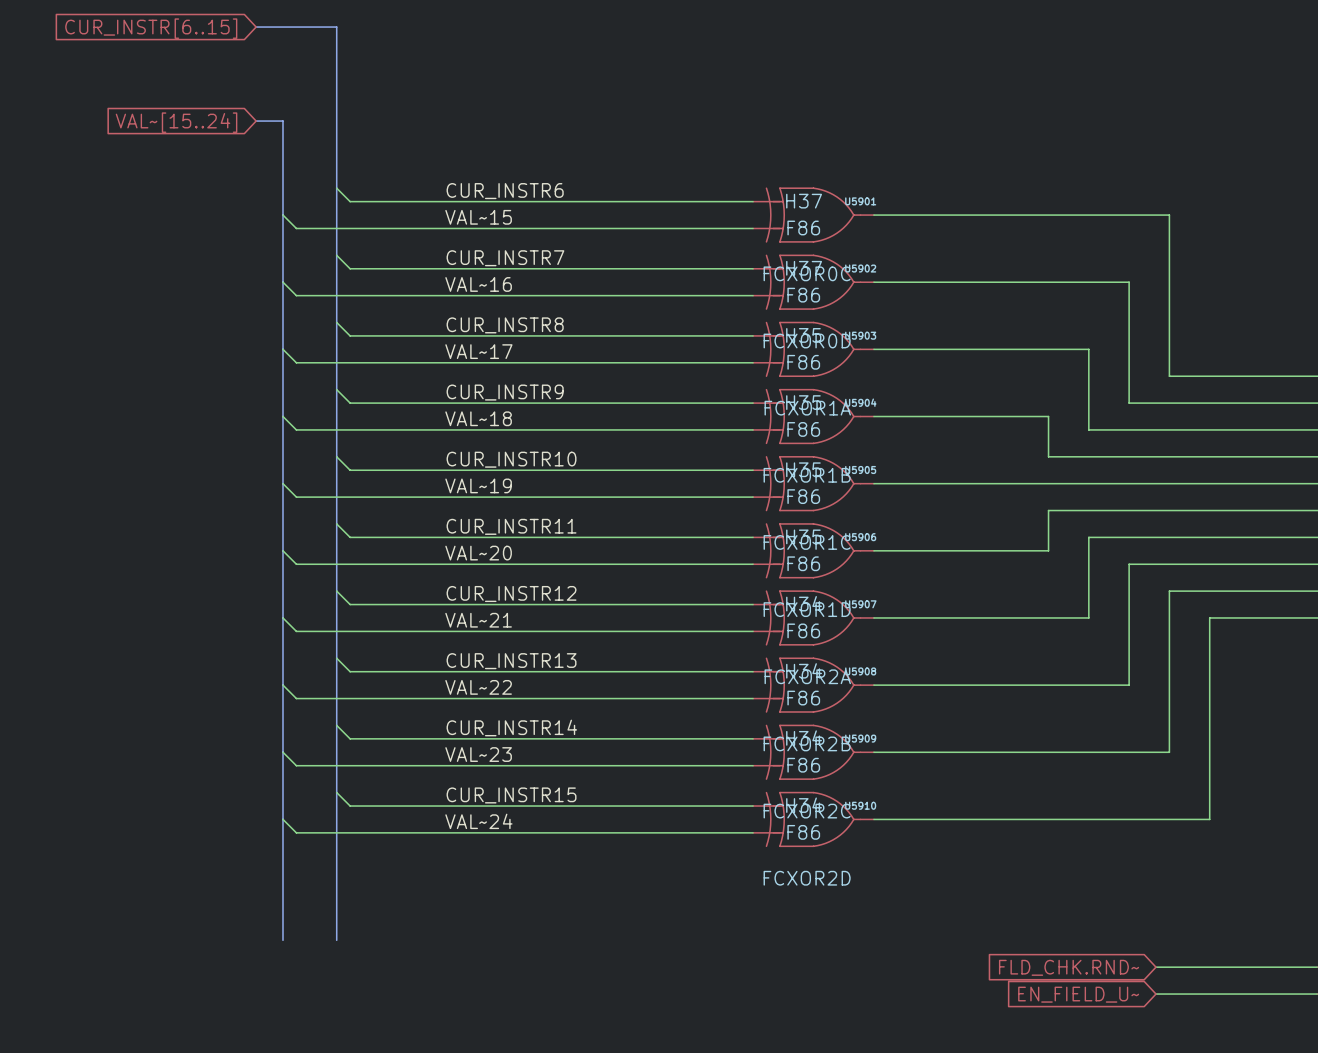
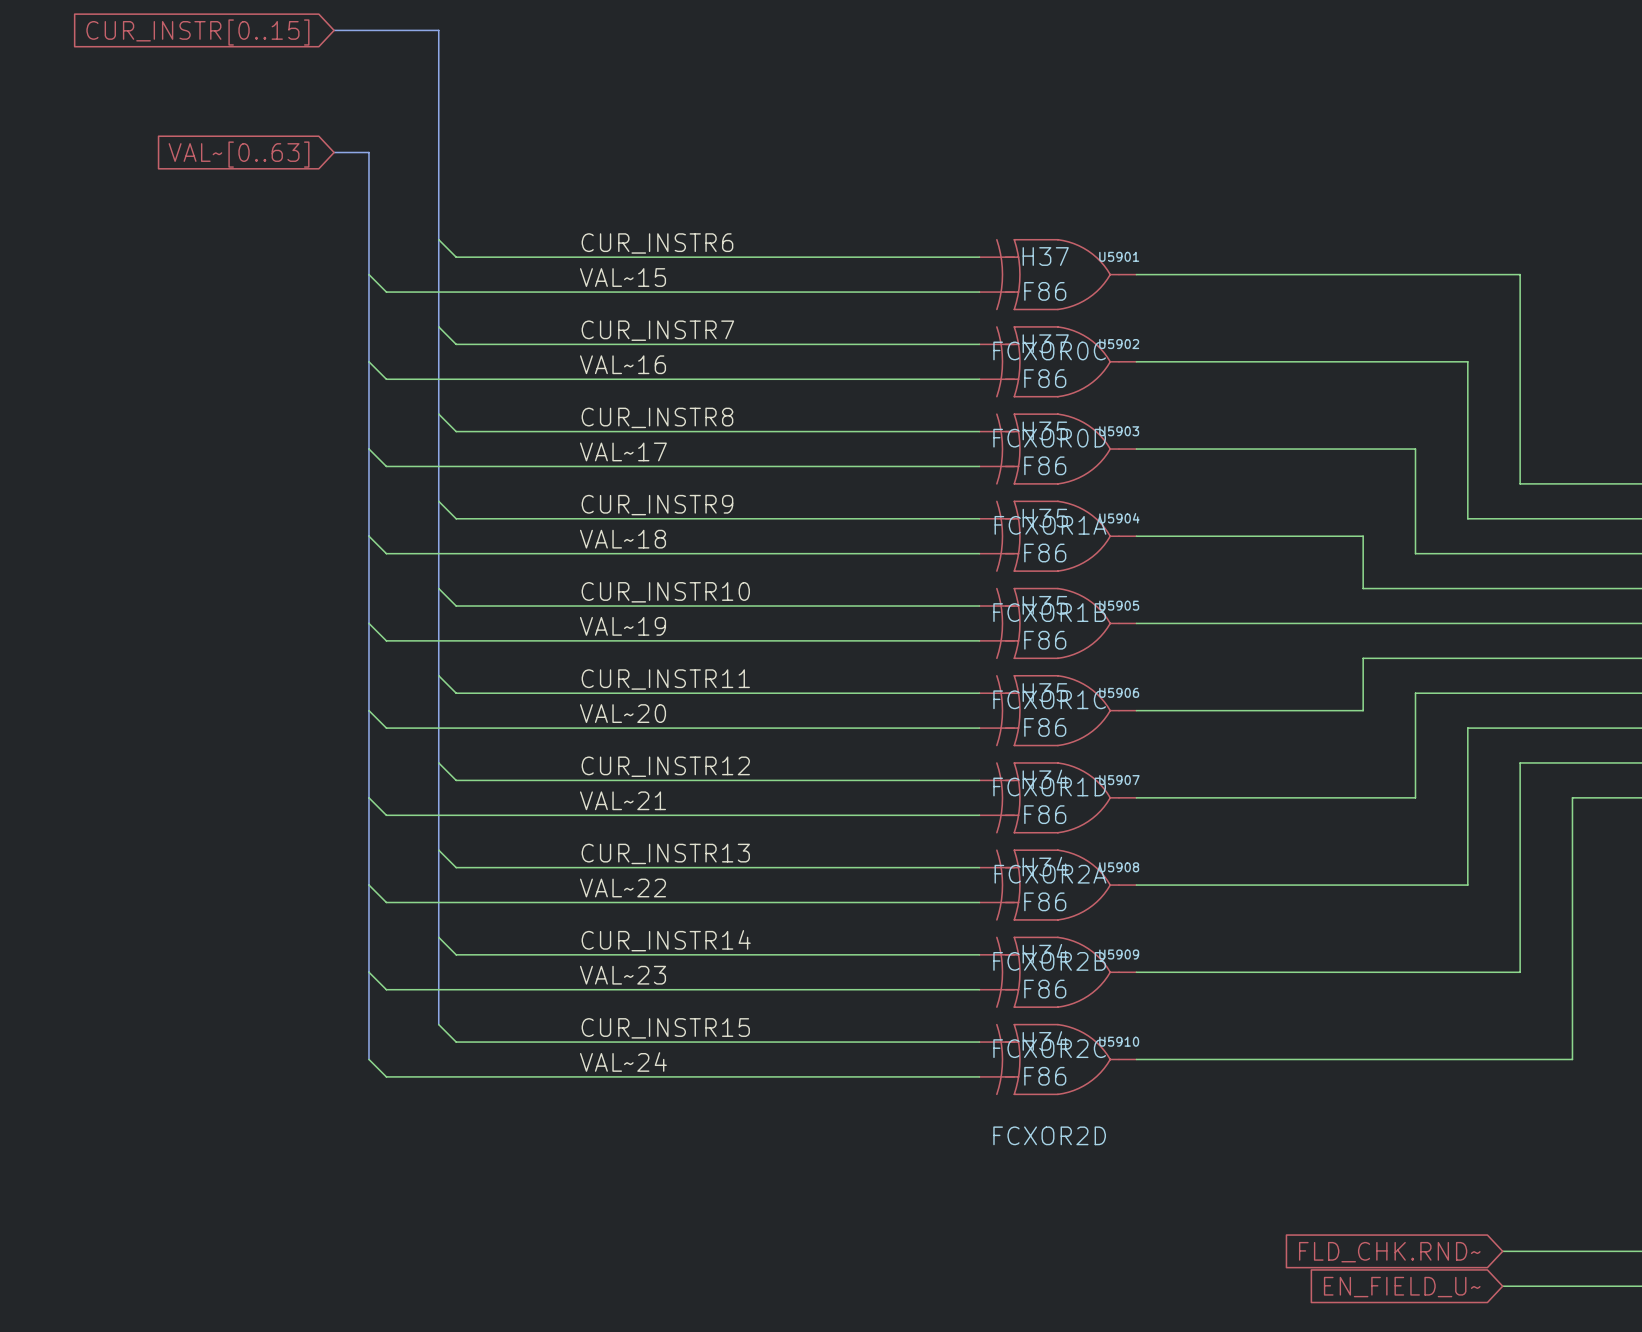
global label: CUR_INSTR[6..15] (151, 28) -> CUR_INSTR[0..15] (197, 32)
global label: VAL~[15..24] (176, 122) -> VAL~[0..63] (239, 154)
bus: (336, 792) (336, 940) -> none
bus: (282, 819) (282, 940) -> none

